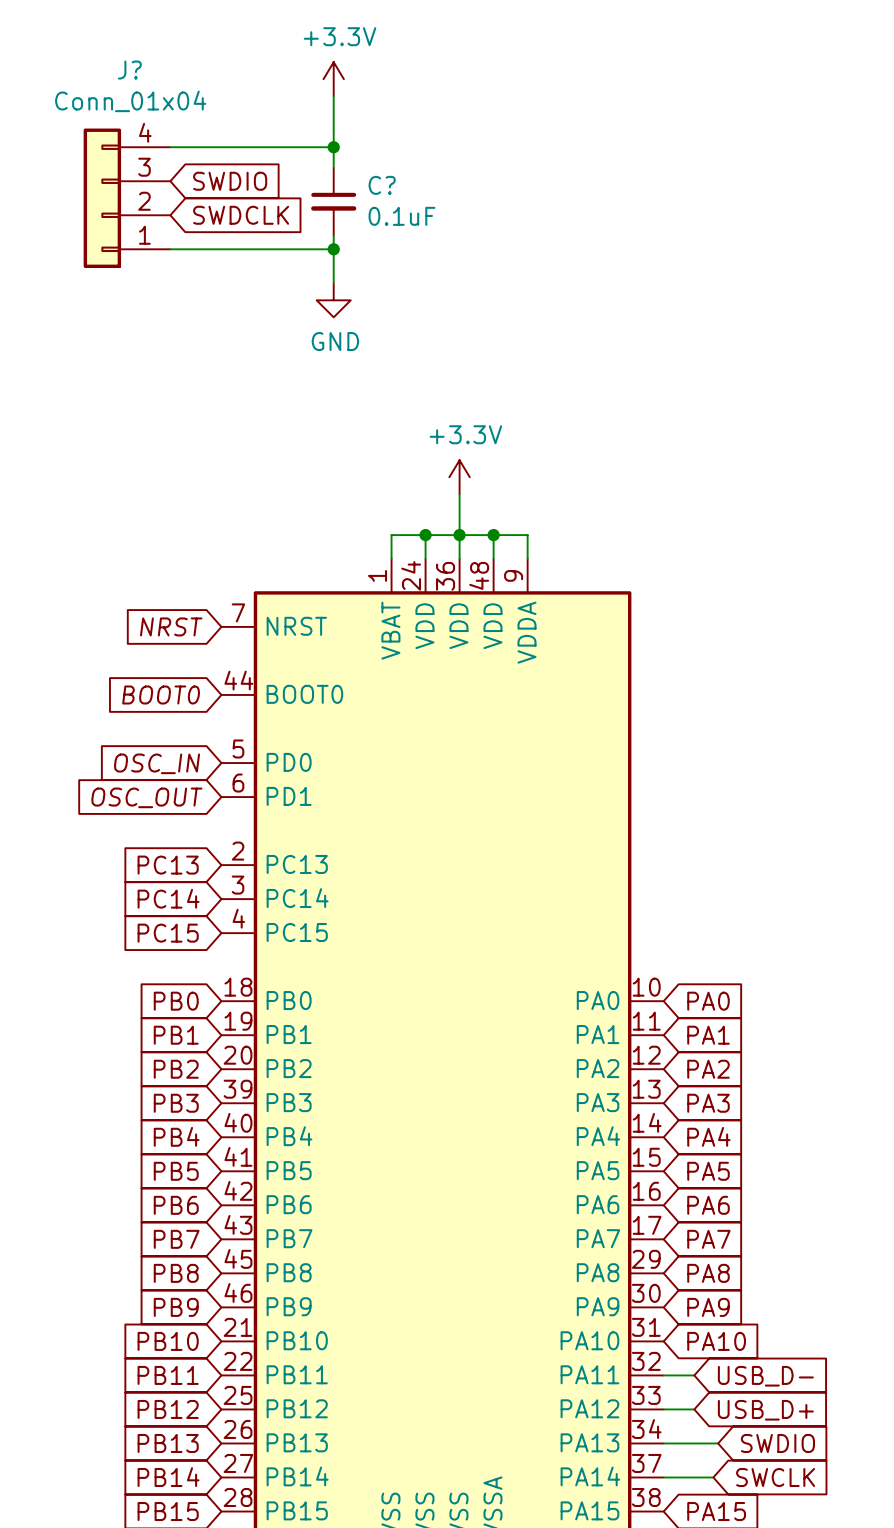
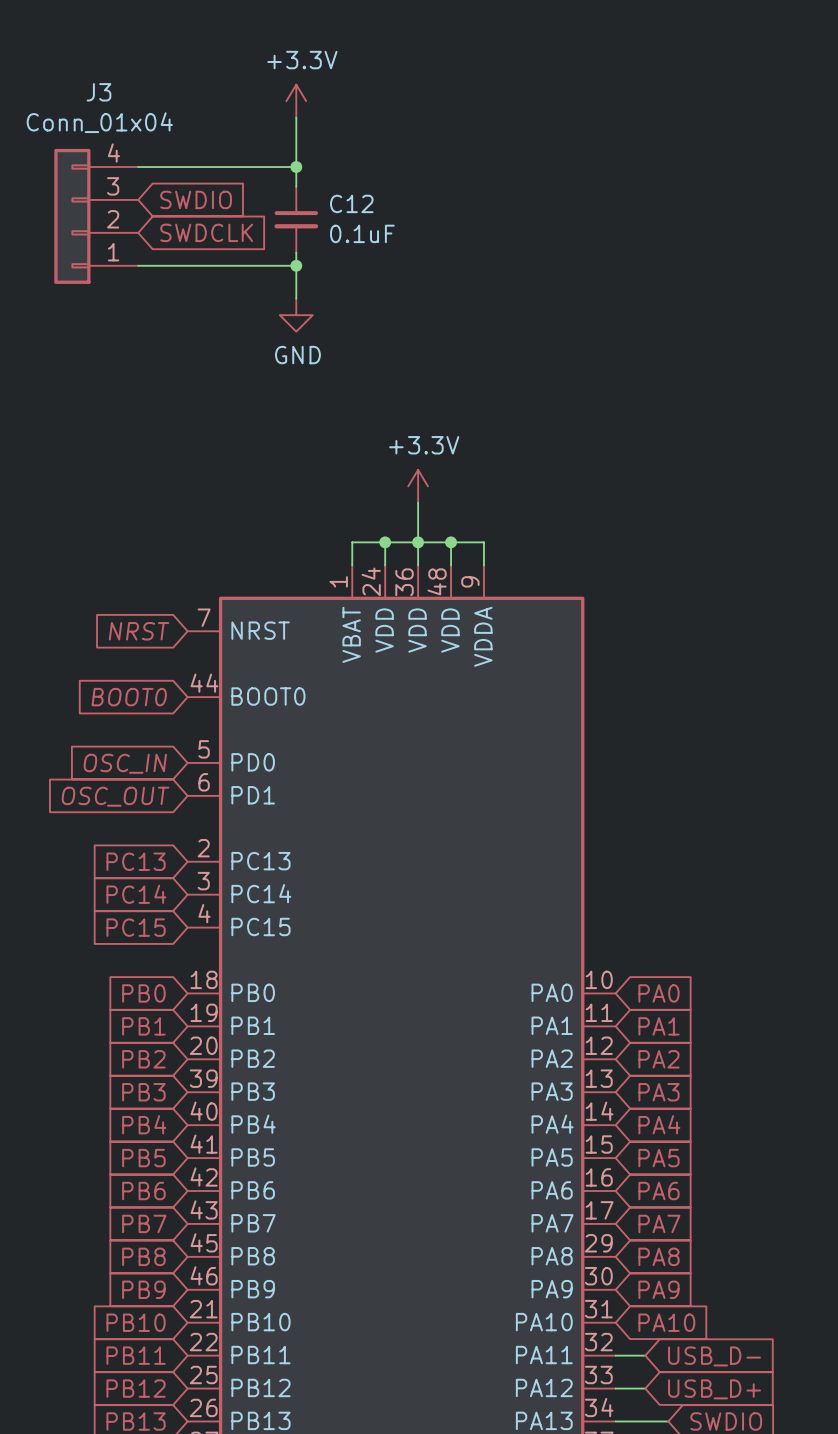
J? name: J? (129, 70) -> J3 (99, 92)
C? name: C? (382, 185) -> C12 (351, 203)

